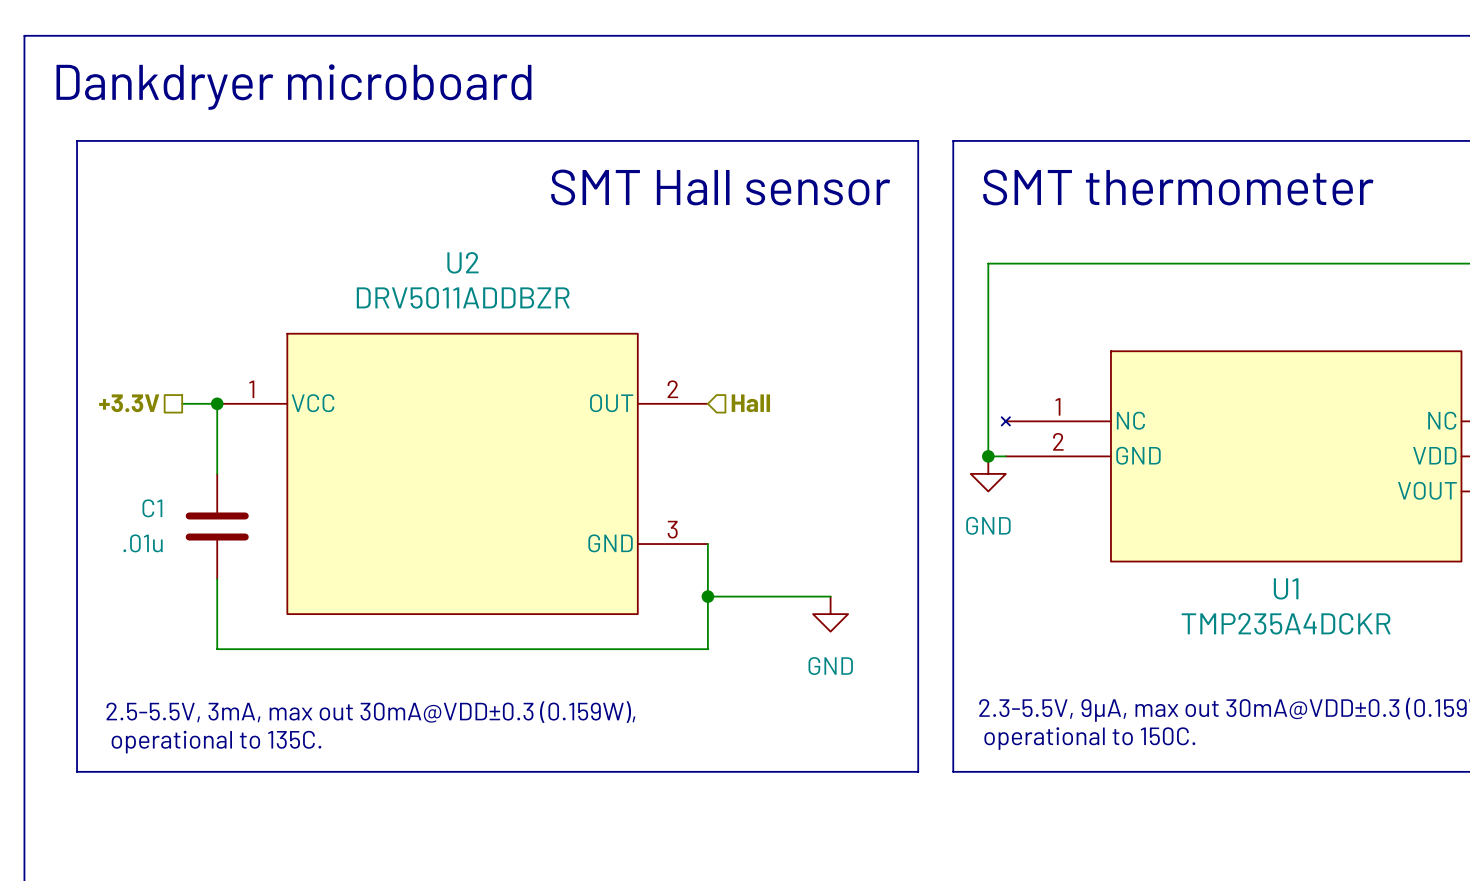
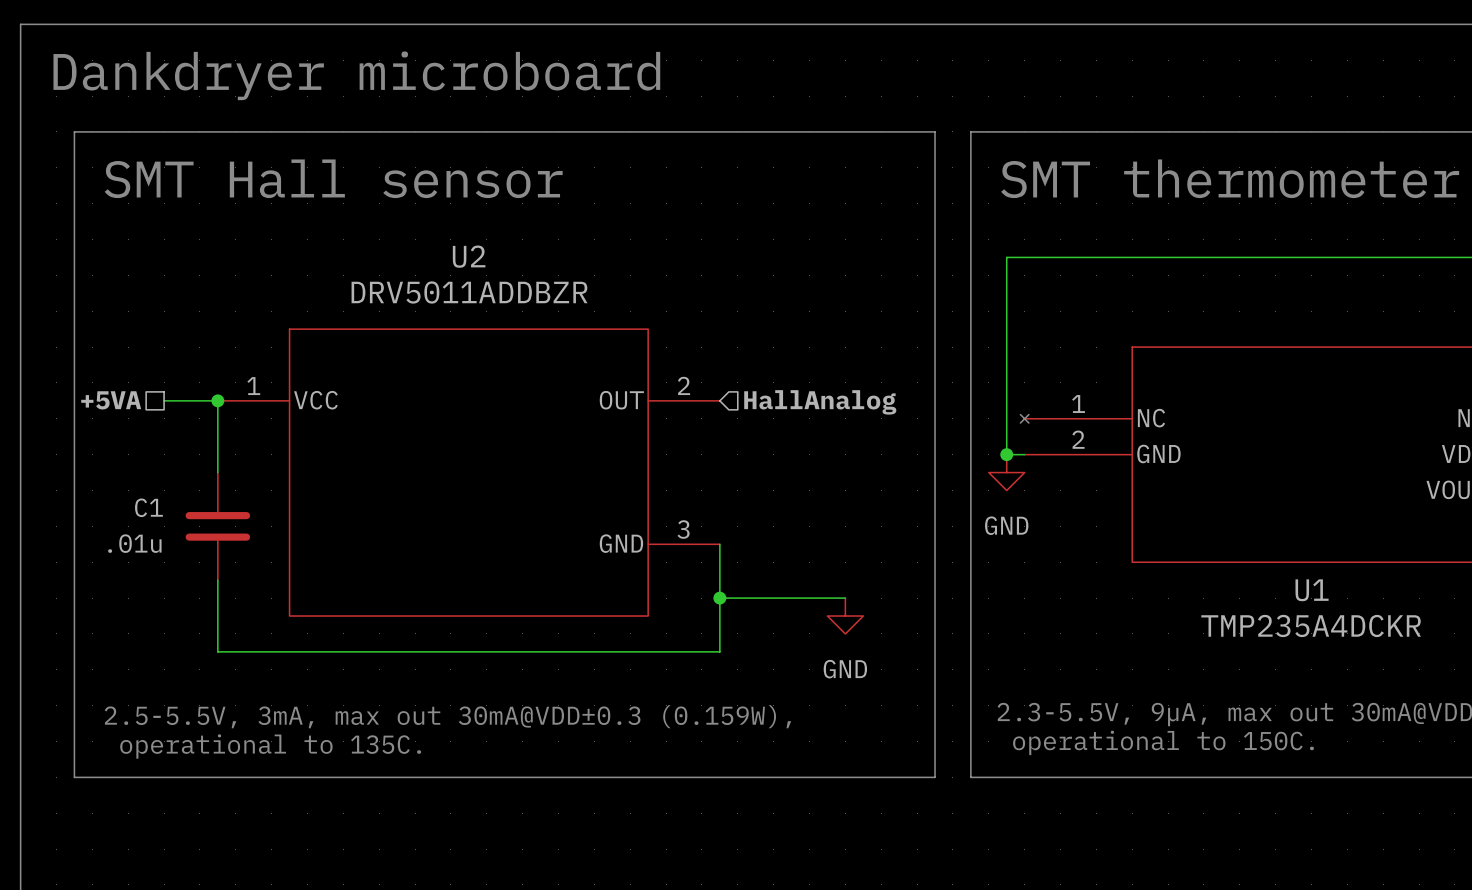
text: none -> SMT Hall sensor (333, 178)
text: SMT Hall sensor (720, 187) -> none
hierarchical label: none -> +5VA (111, 400)
hierarchical label: +3.3V (129, 403) -> none
wire: none -> (164, 400) (181, 400)
hierarchical label: Hall (750, 403) -> HallAnalog (820, 402)

